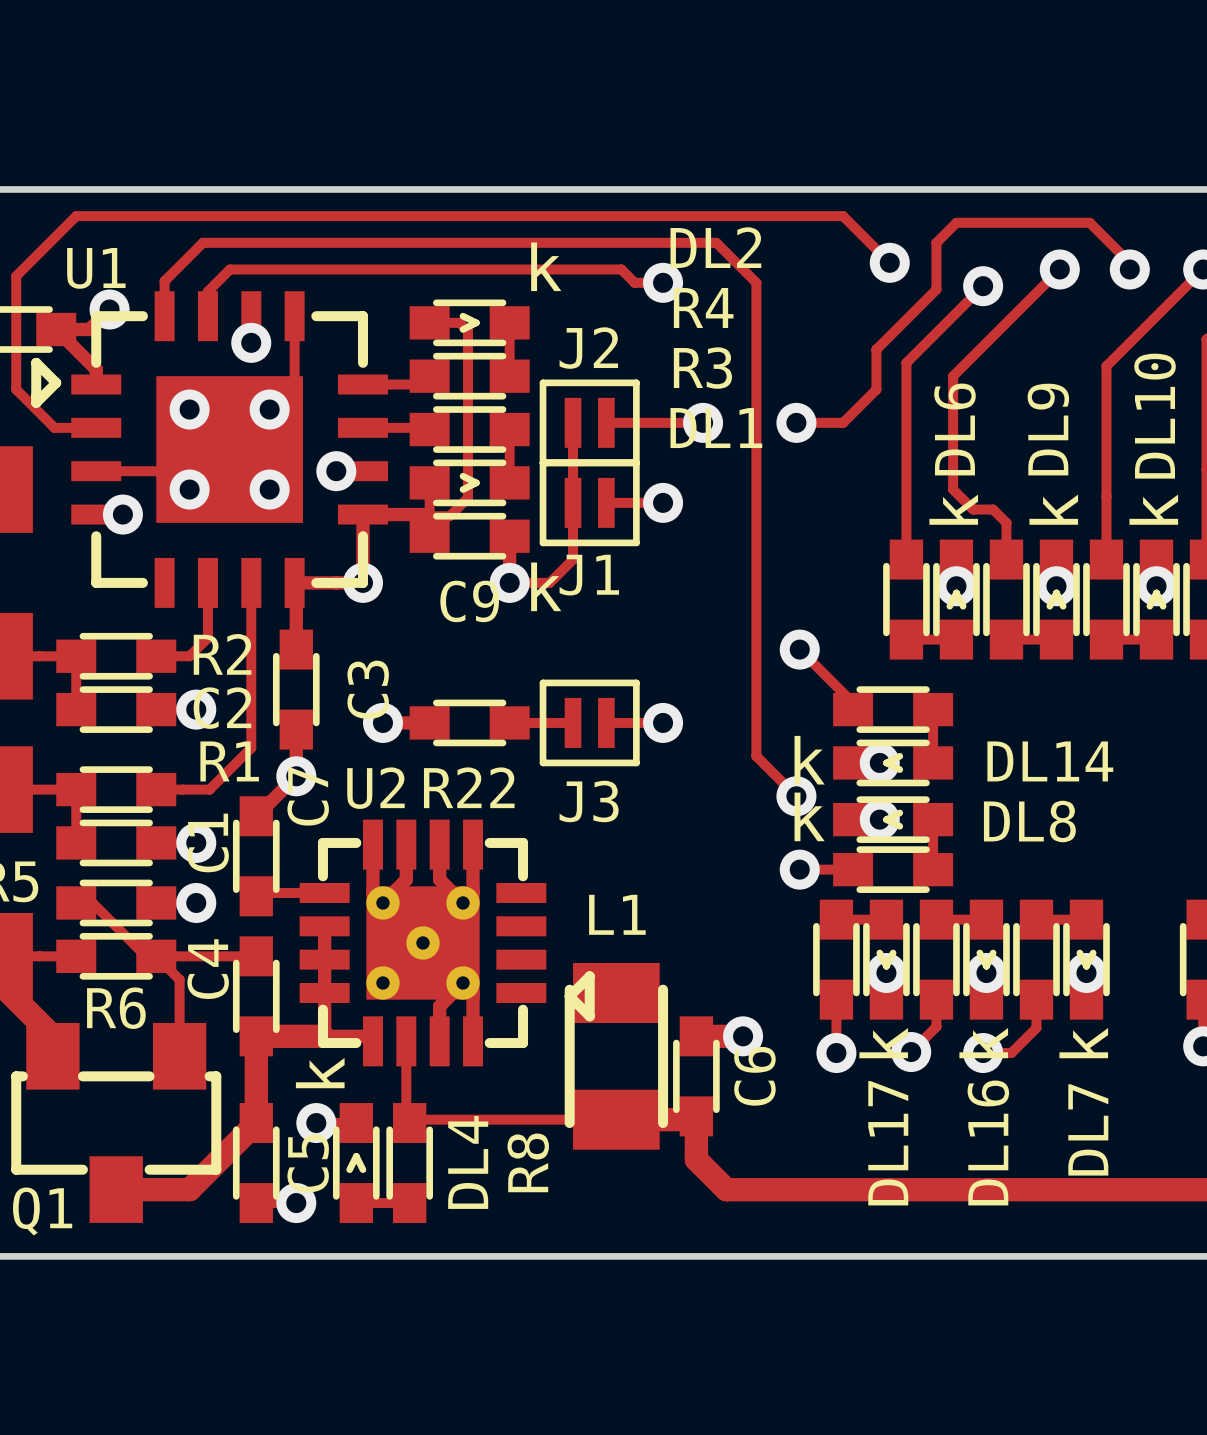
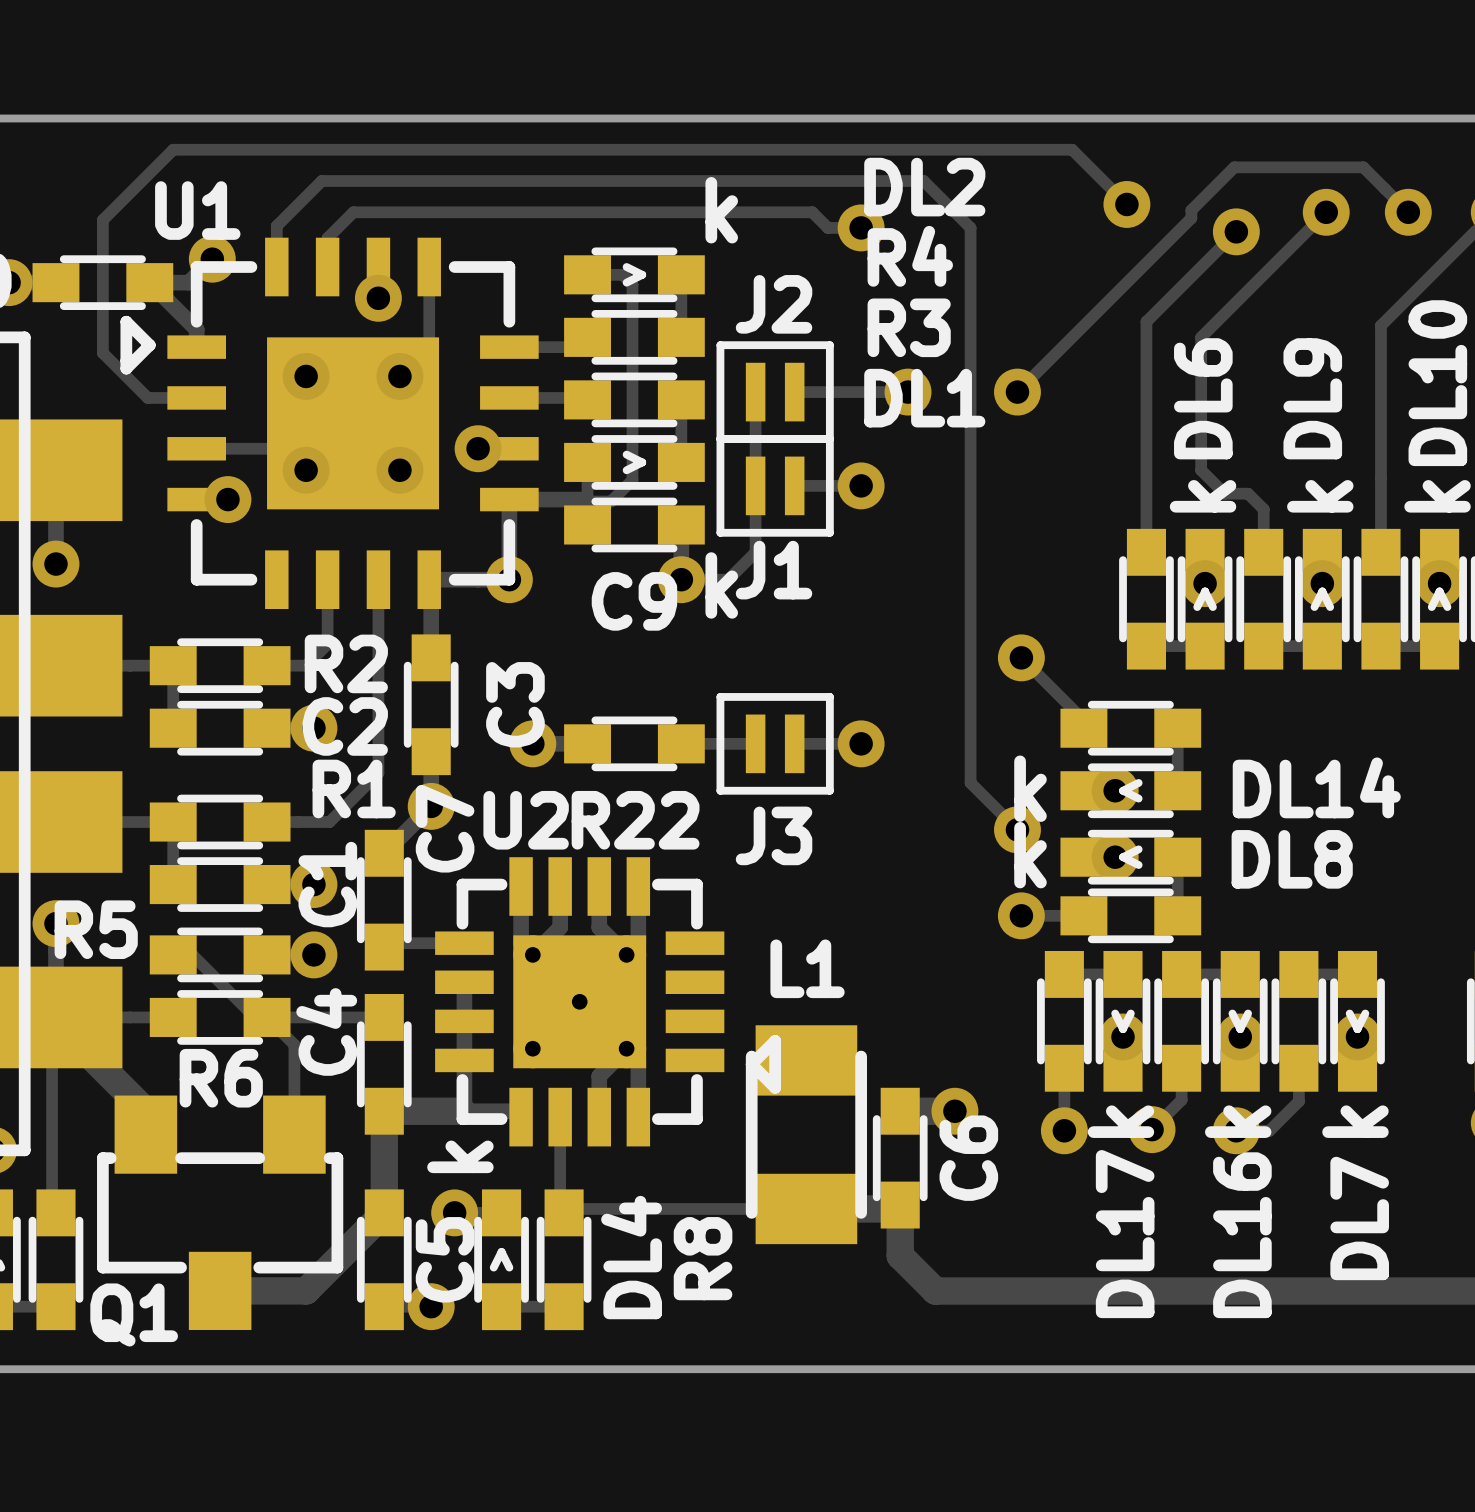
track: (1129, 269) (1129, 262) (1089, 222) (956, 222) (936, 242) (936, 289) (876, 349) (876, 389) (843, 422) (796, 422) -> (1408, 212) (1363, 167) (1234, 167) (1191, 210) (1191, 218) (1017, 392)

